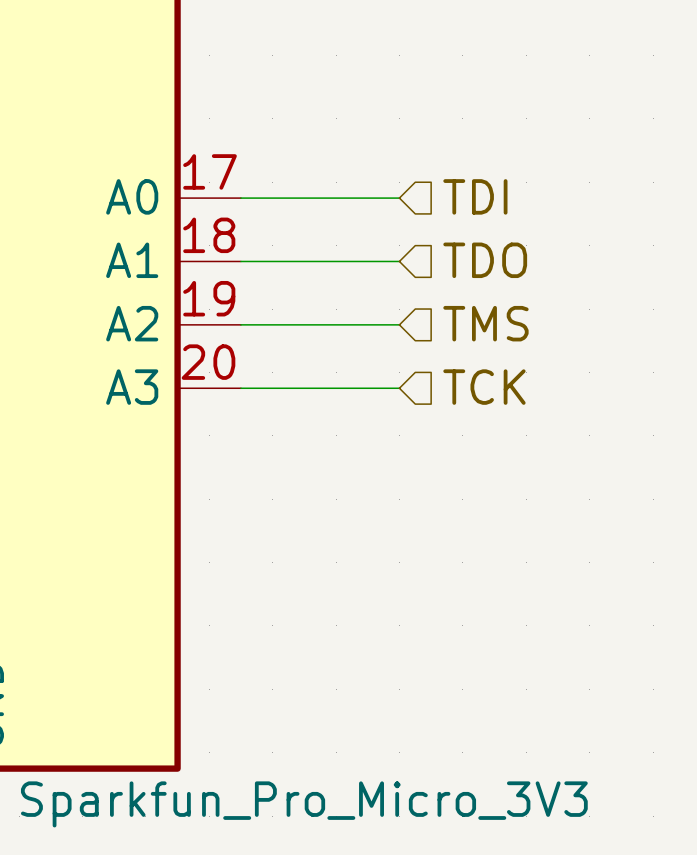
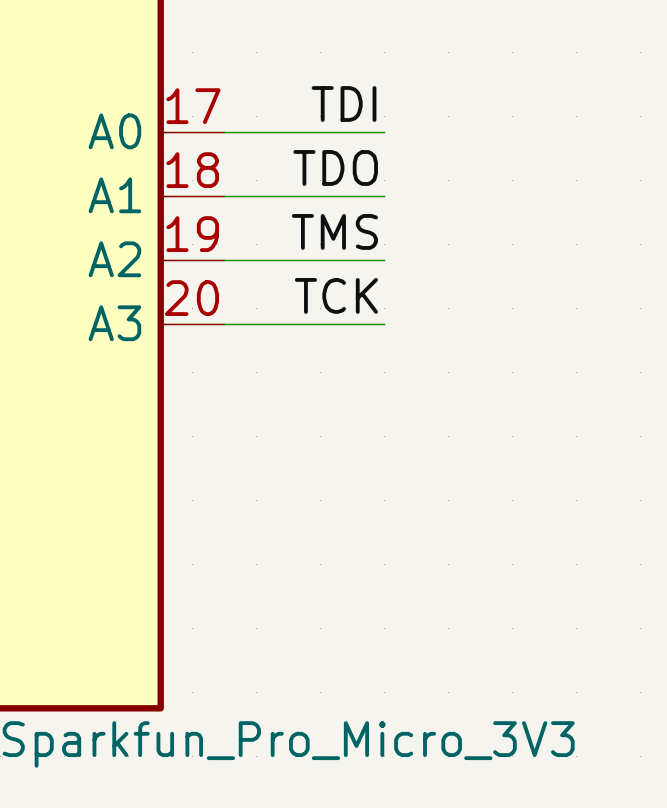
label: none -> TDI (344, 103)
hierarchical label: TDI (475, 196) -> none
label: none -> TDO (335, 167)
hierarchical label: TDO (485, 260) -> none
label: none -> TMS (334, 231)
hierarchical label: TMS (485, 323) -> none
label: none -> TCK (336, 295)
hierarchical label: TCK (484, 387) -> none

